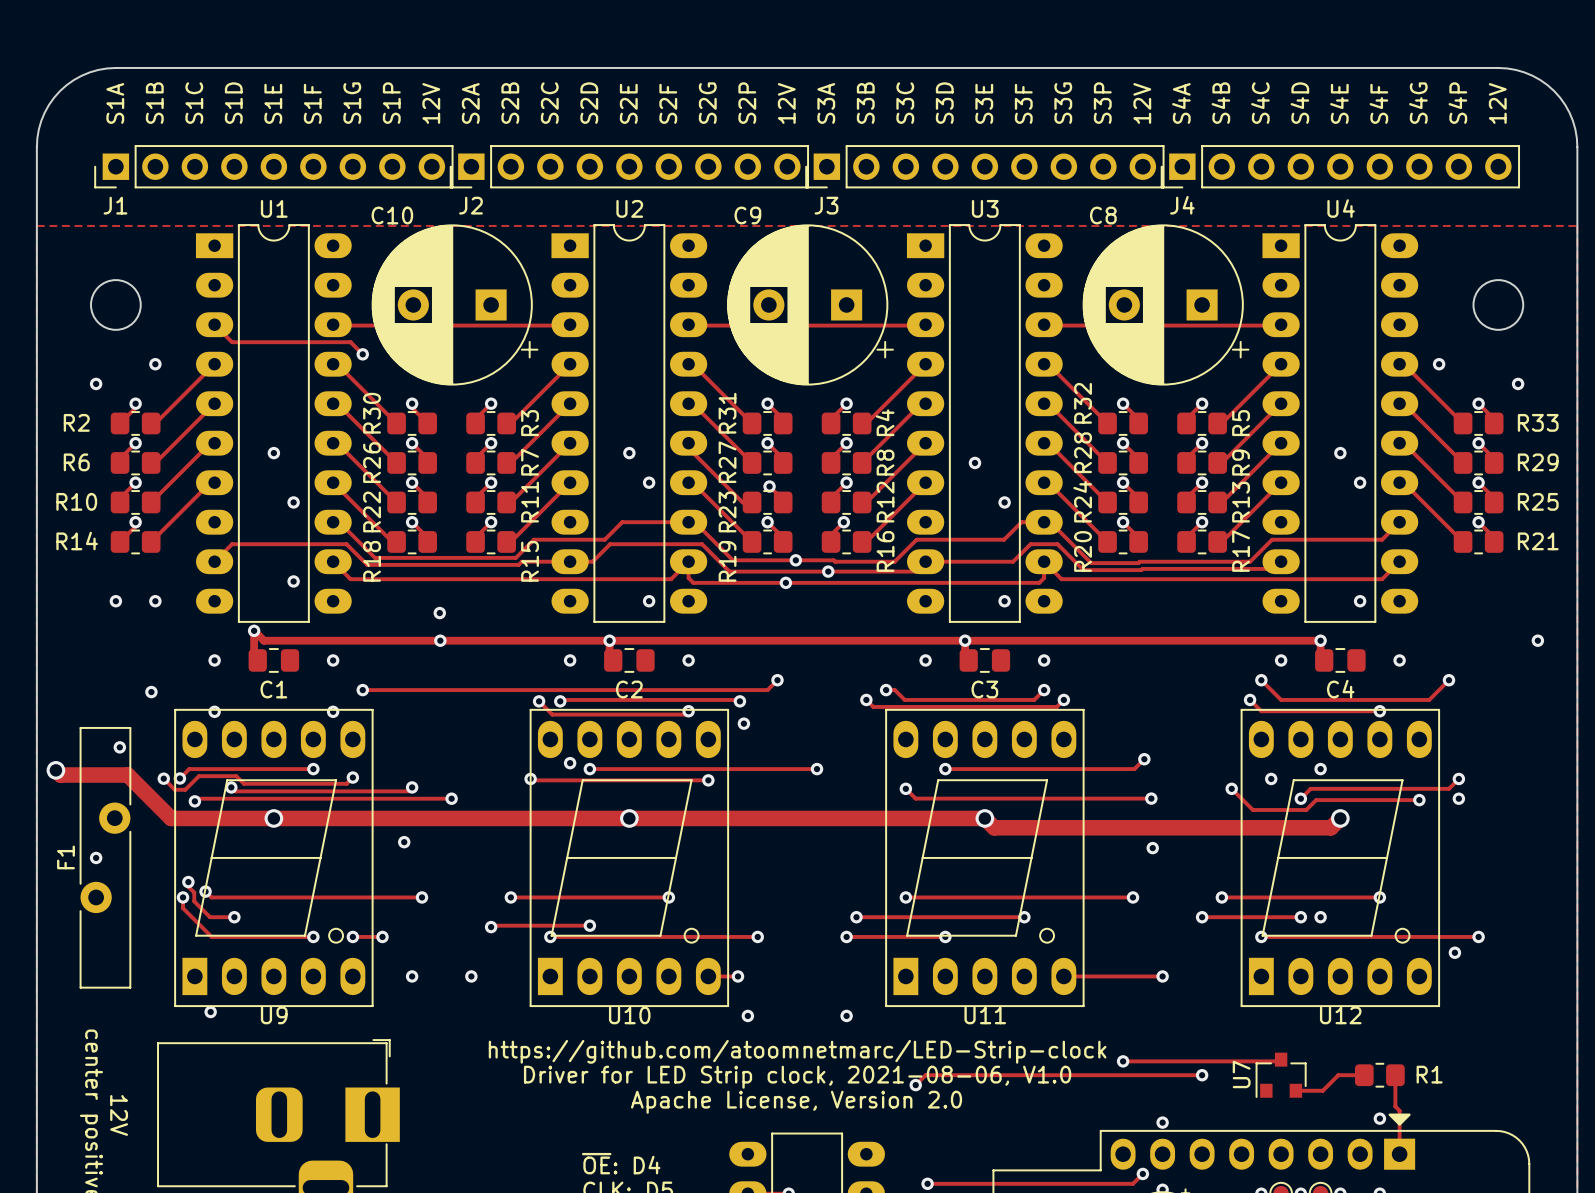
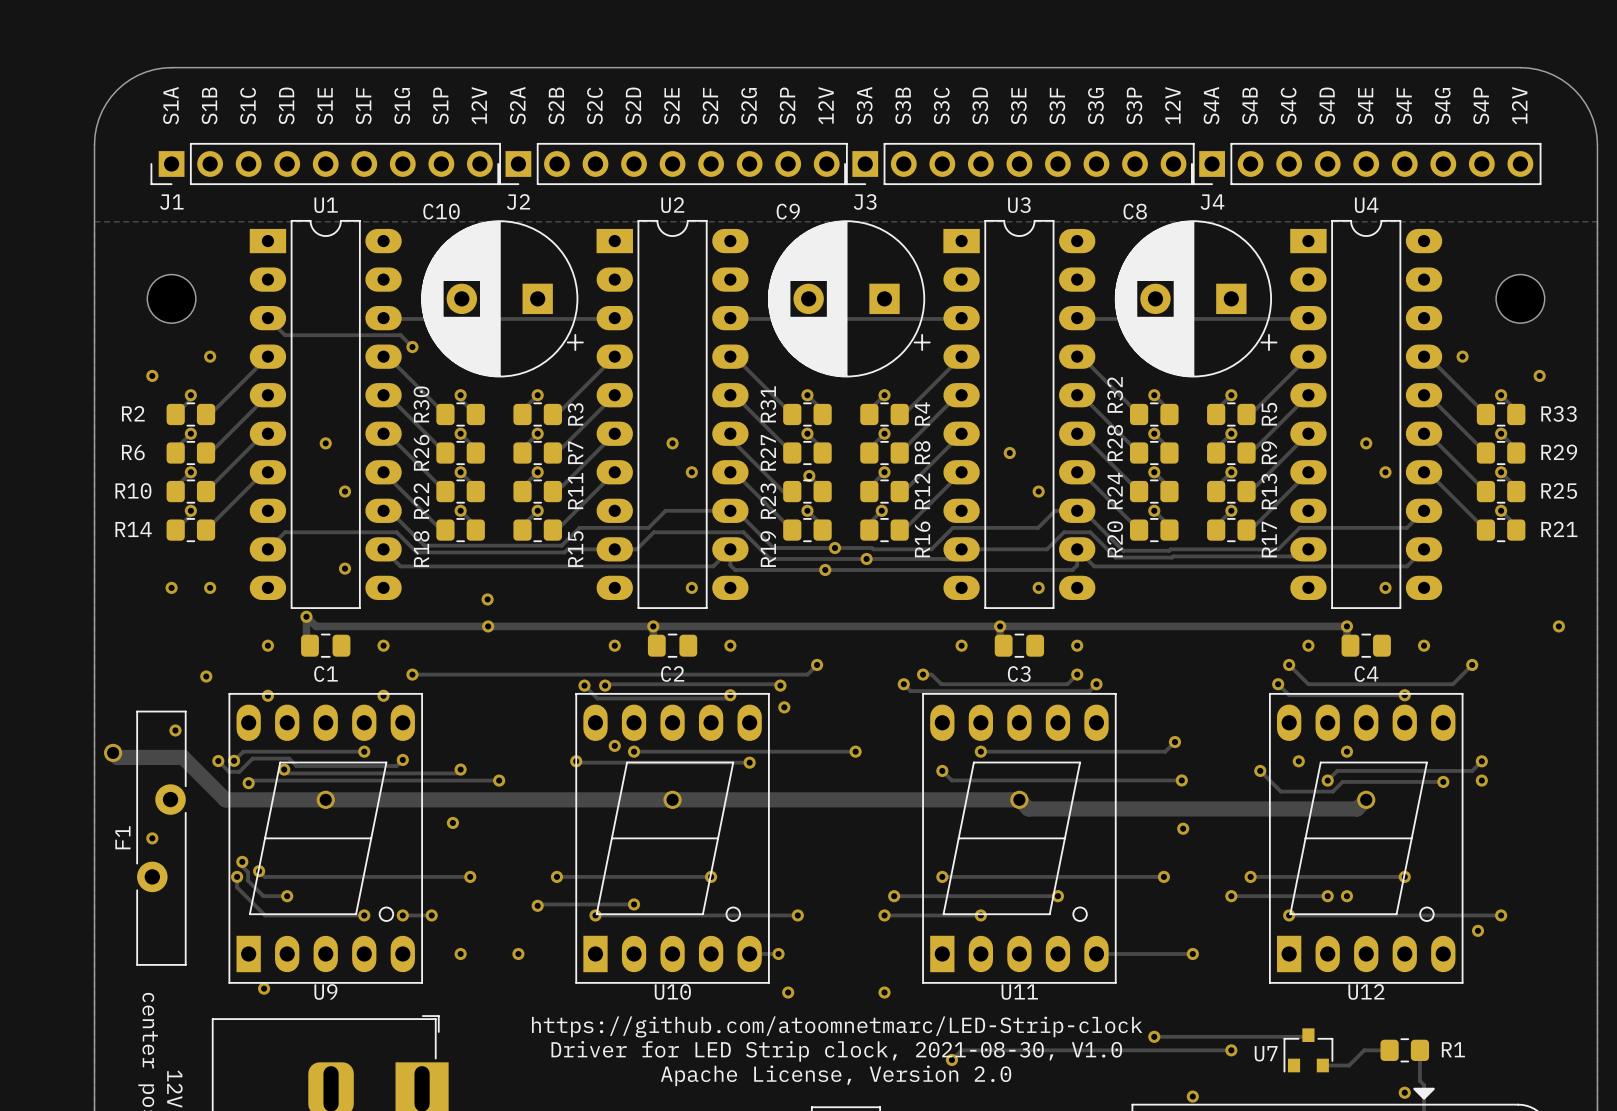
U7 name rotation: 0° (1241, 1074) -> 90° clockwise (1266, 1053)
text: Driver for LED Strip clock, 2021-08-06, V1.0 (797, 1077) -> Driver for LED Strip clock, 2021-08-30, V1.0 (836, 1051)

